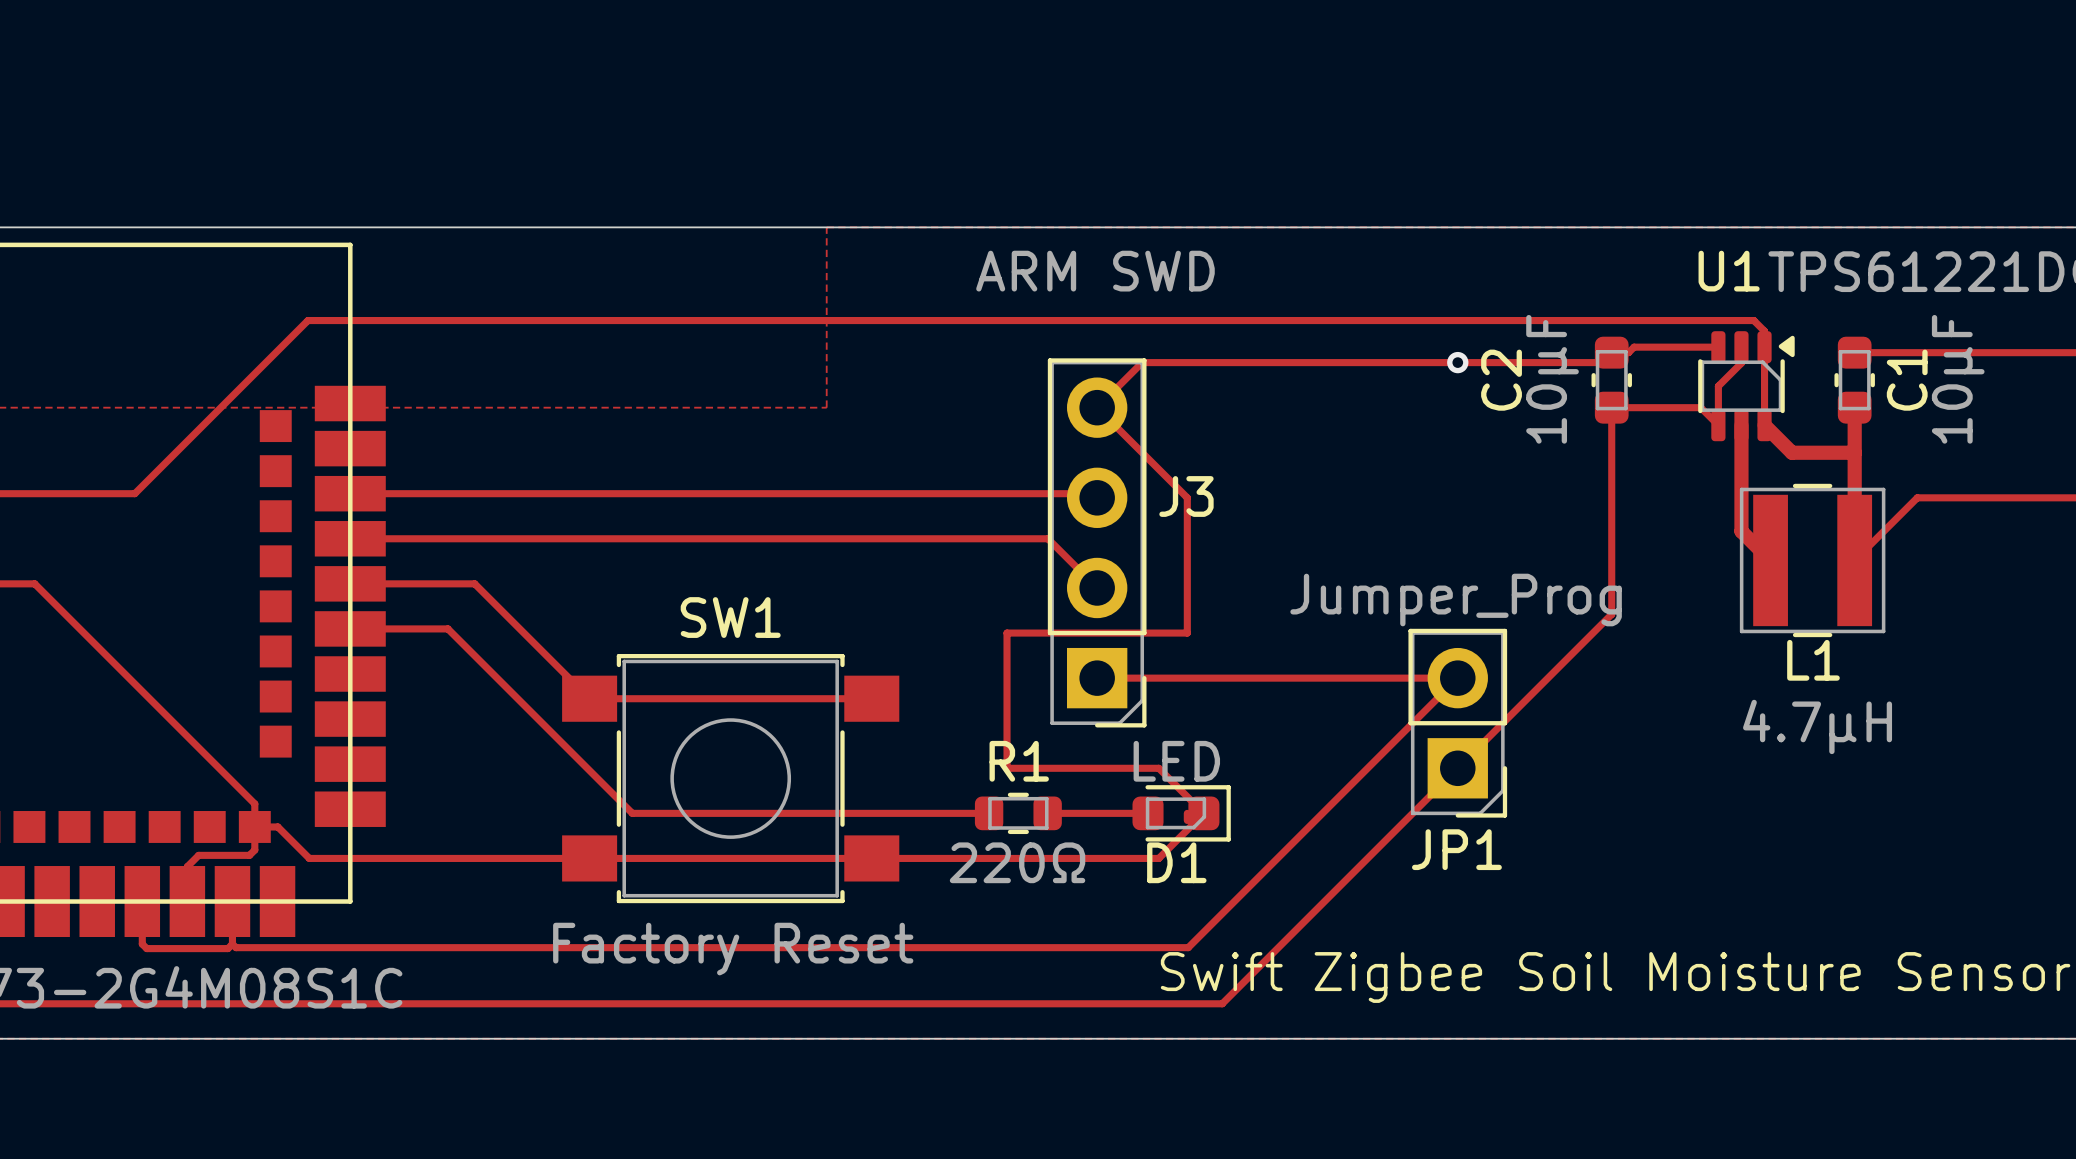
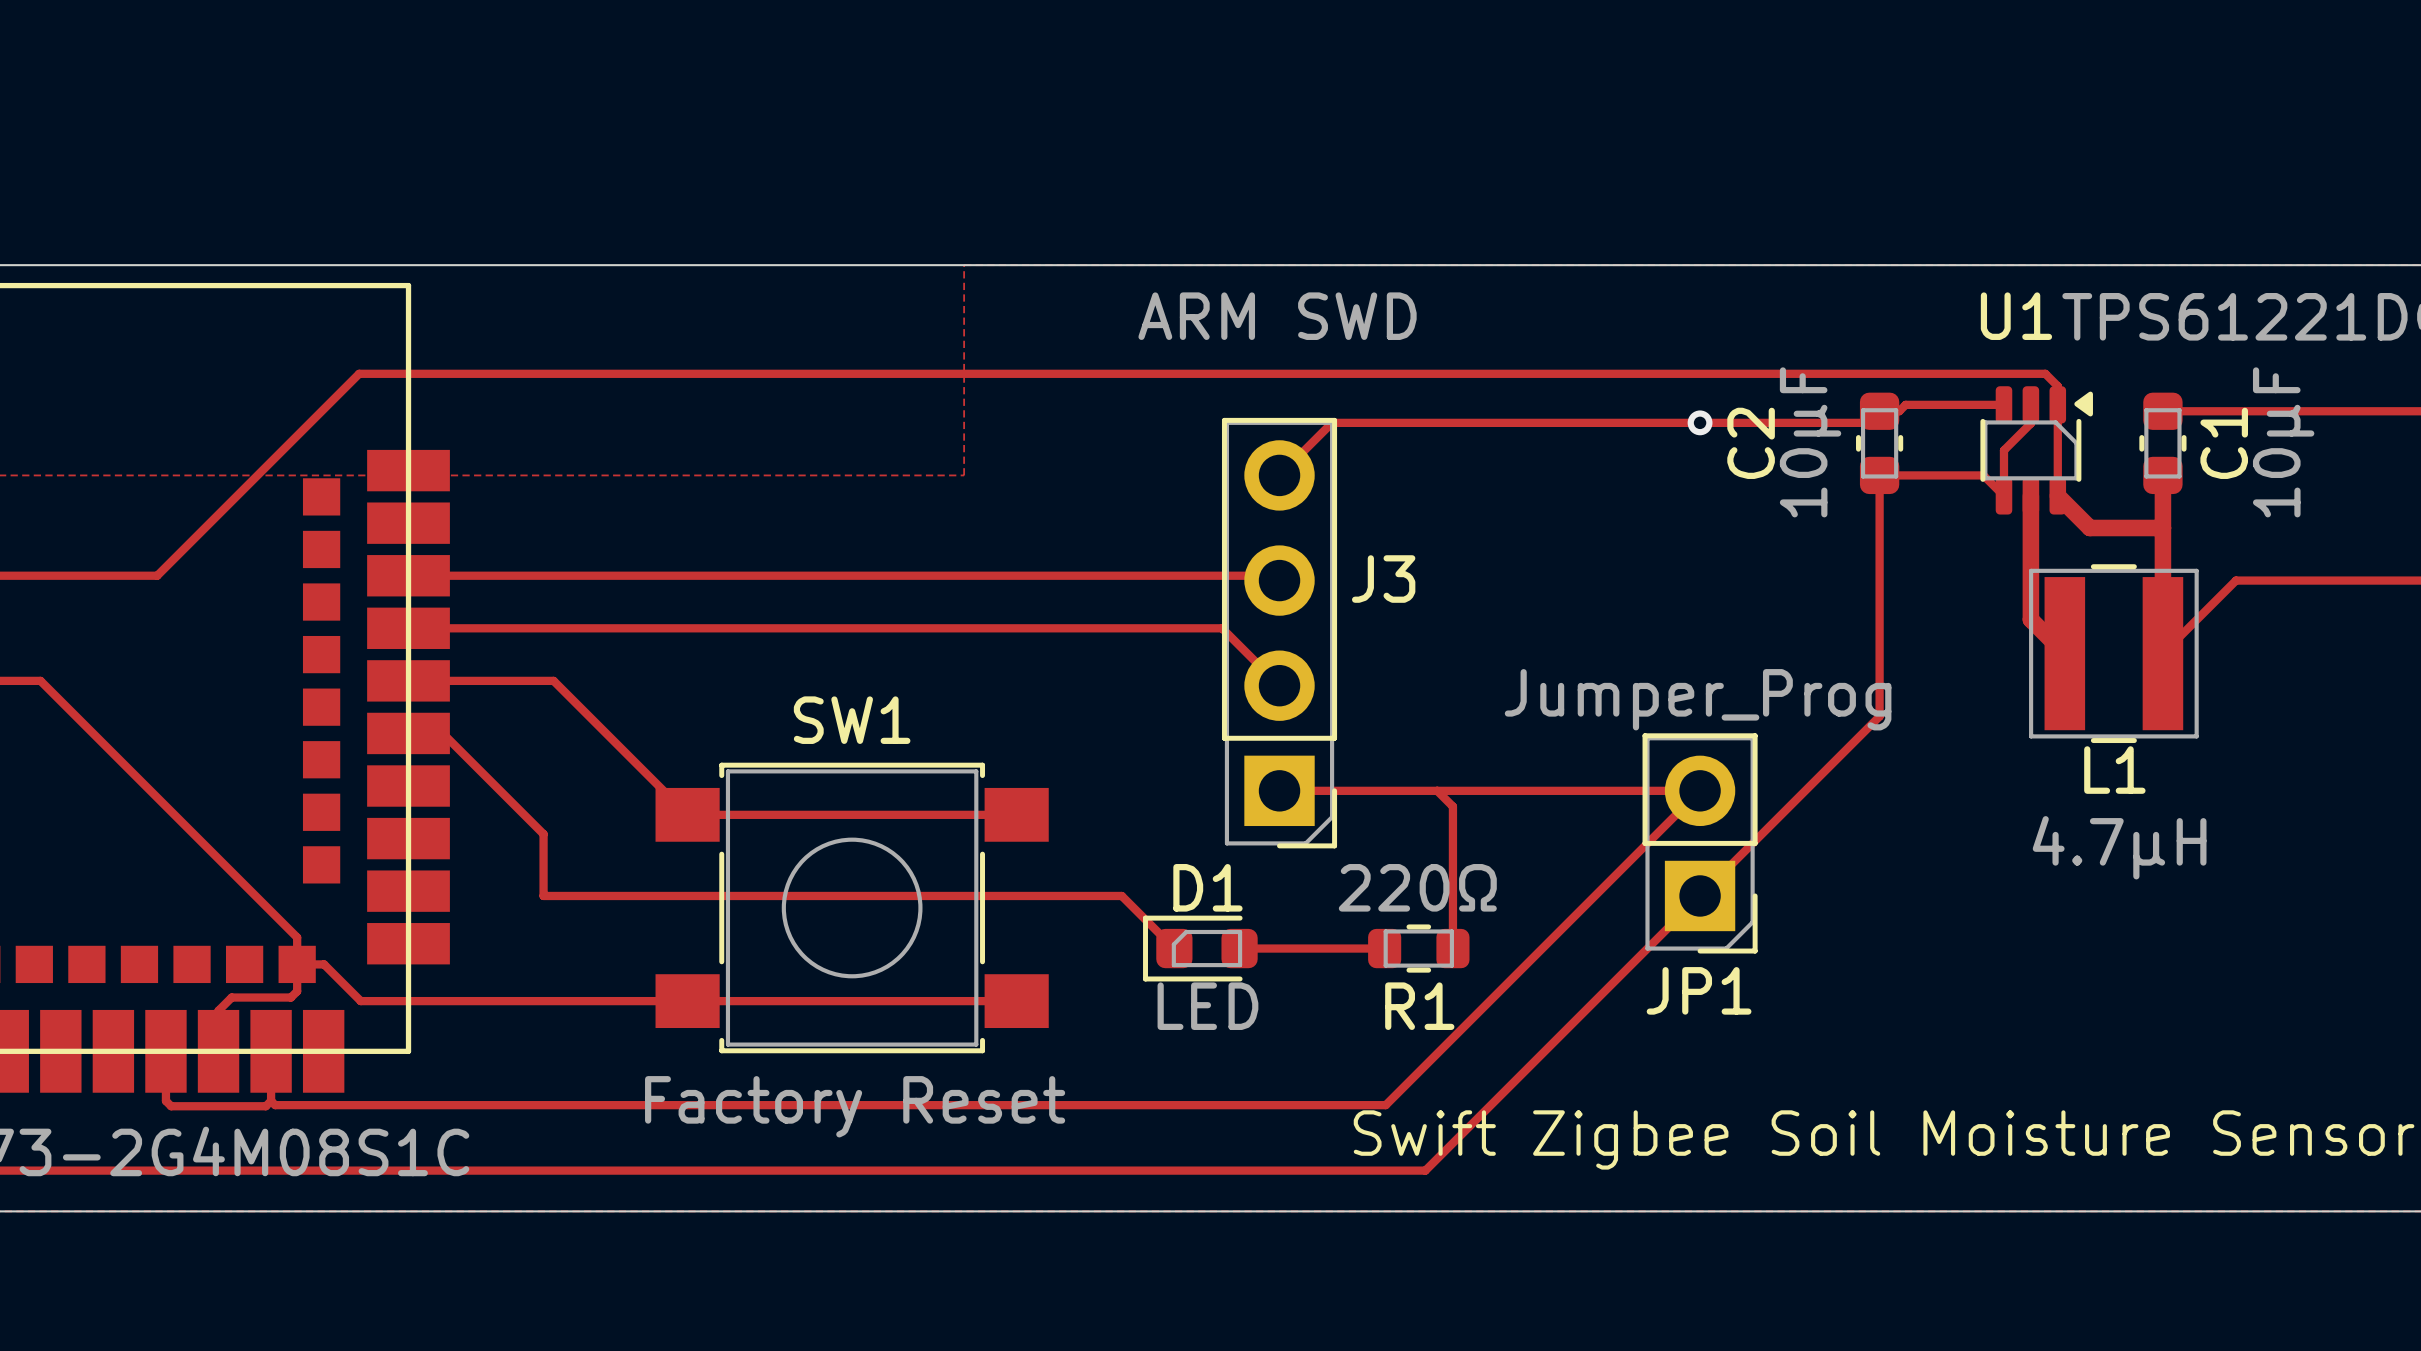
track: (1097, 407) (1187, 497) (1187, 633) (1007, 633) (1007, 768) (1158, 768) (1203, 813) (1158, 858) (871, 858) -> none
track: (379, 628) (447, 628) (632, 813) (989, 813) -> (442, 733) (543, 834) (543, 895) (1121, 895) (1174, 948)
track: none -> (1437, 790) (1452, 806) (1452, 948)
R1 name position: R1 (1019, 761) -> R1 (1419, 1006)
R1 position: (1018, 813) -> (1418, 948)
D1 rotation: 0° (1181, 813) -> 180° (1200, 948)
D1 position: (1181, 813) -> (1200, 948)
track: (1187, 813) (1187, 820) -> (1384, 948) (1338, 948)
R1 value position: 220Ω (1017, 862) -> 220Ω (1417, 887)

